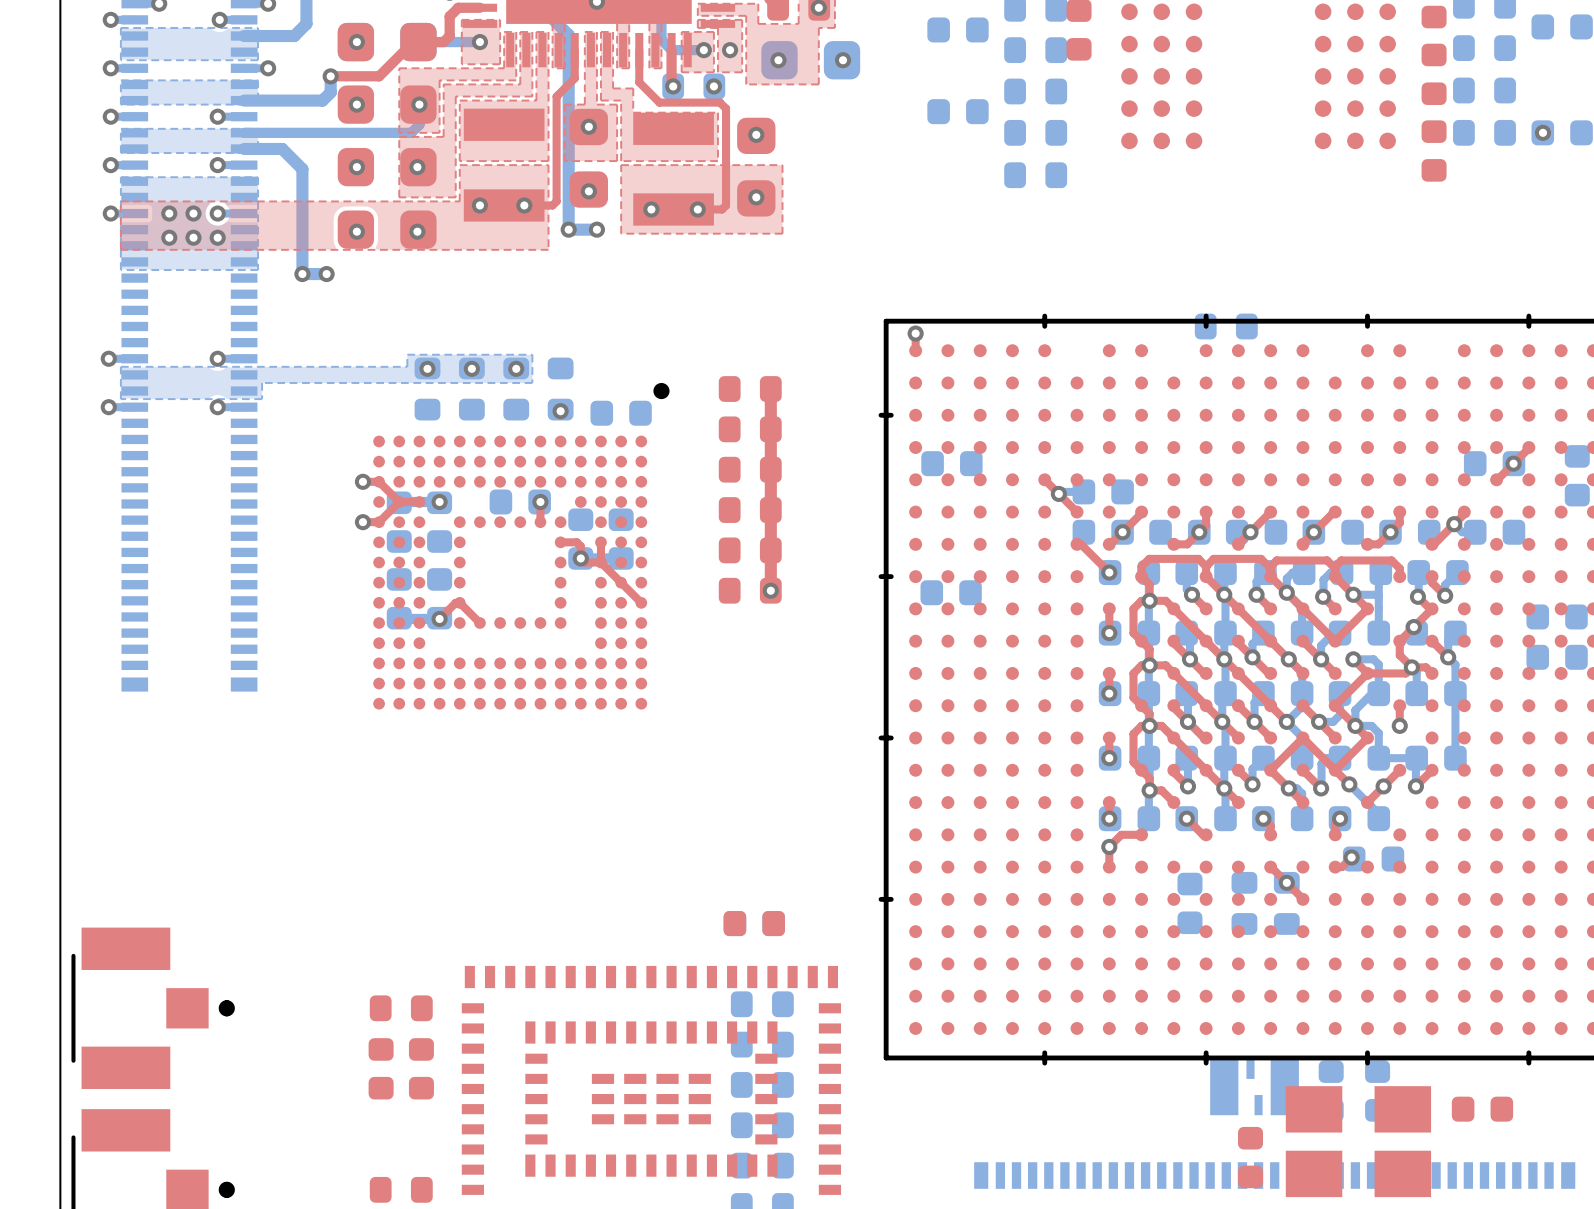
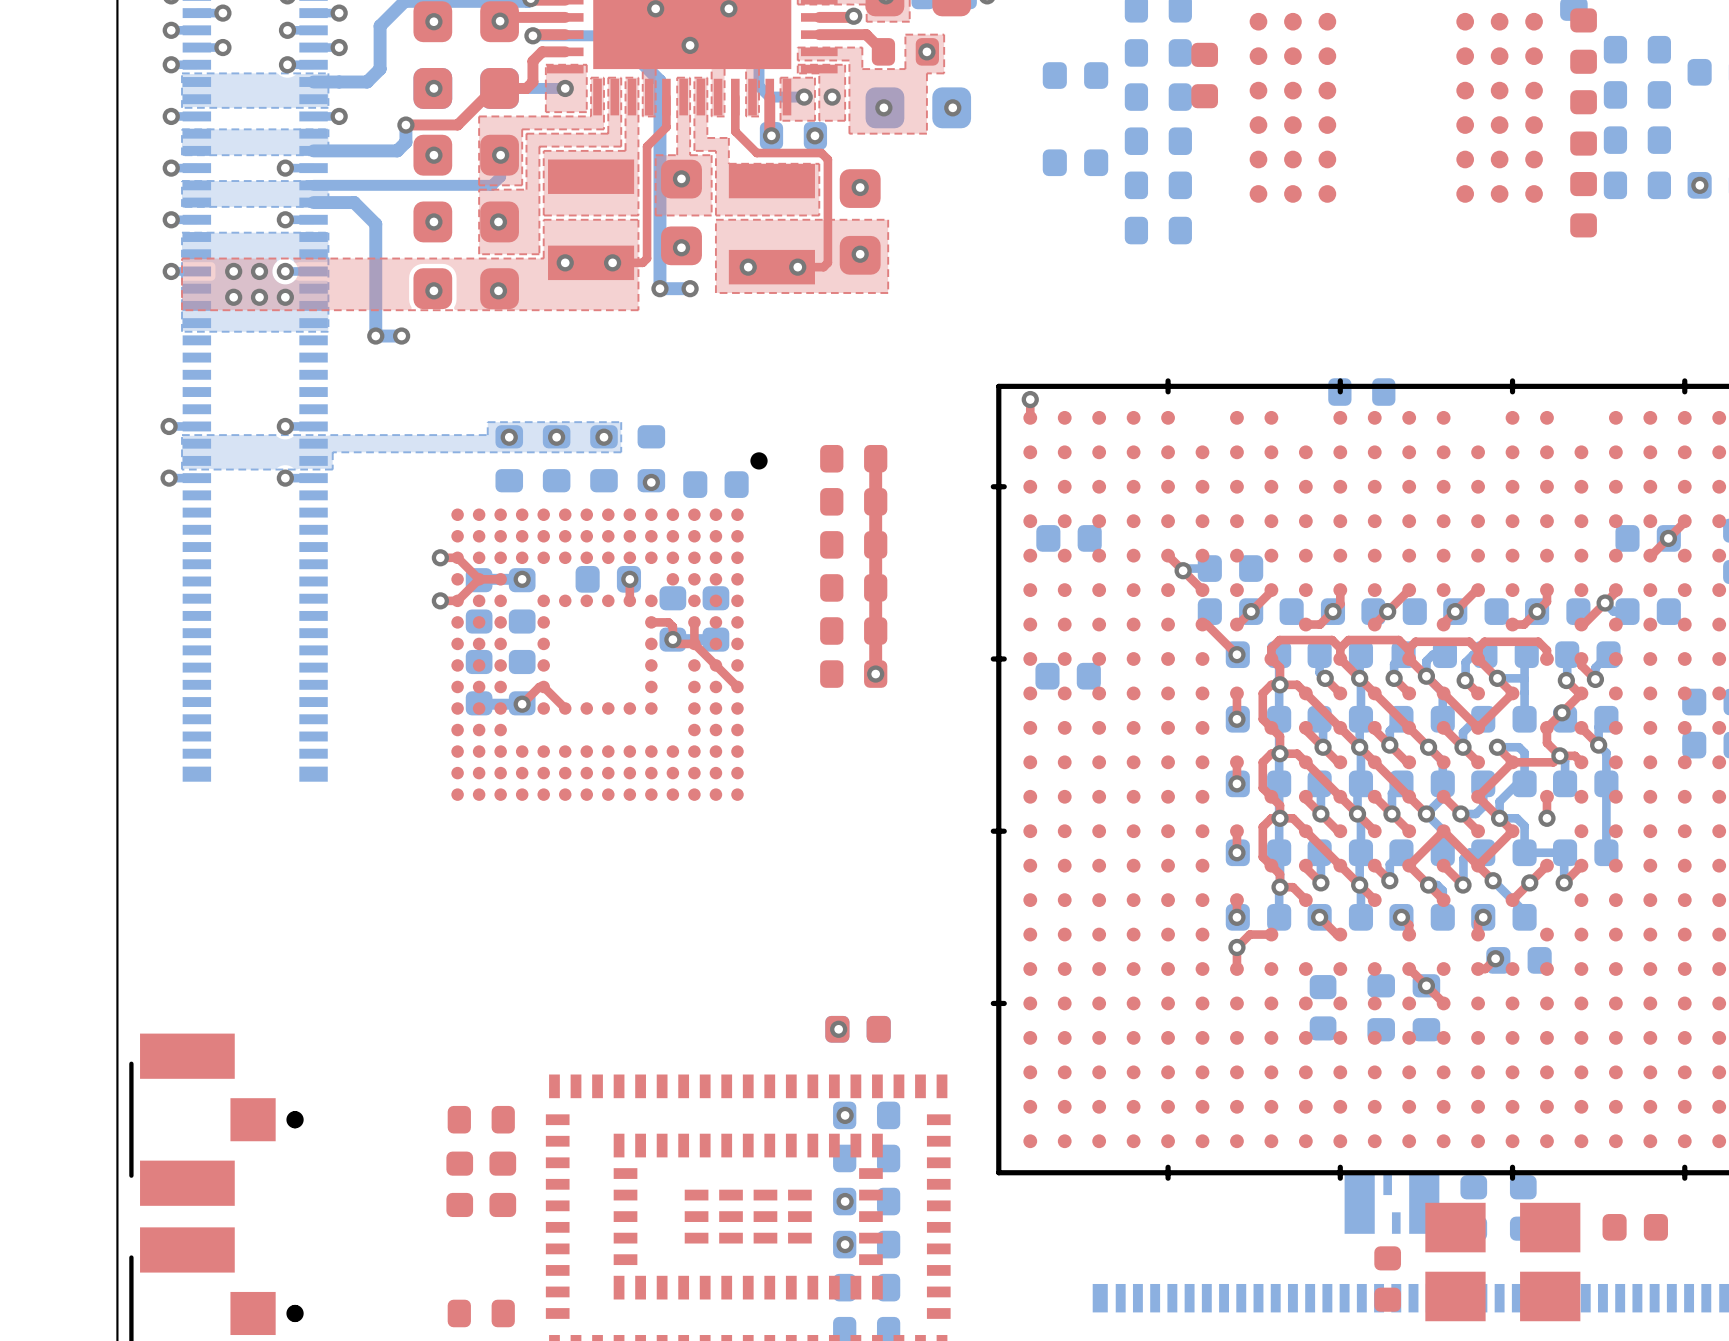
via: none -> (838, 1029)
via: none -> (845, 1115)
via: none -> (845, 1201)
via: none -> (845, 1244)

